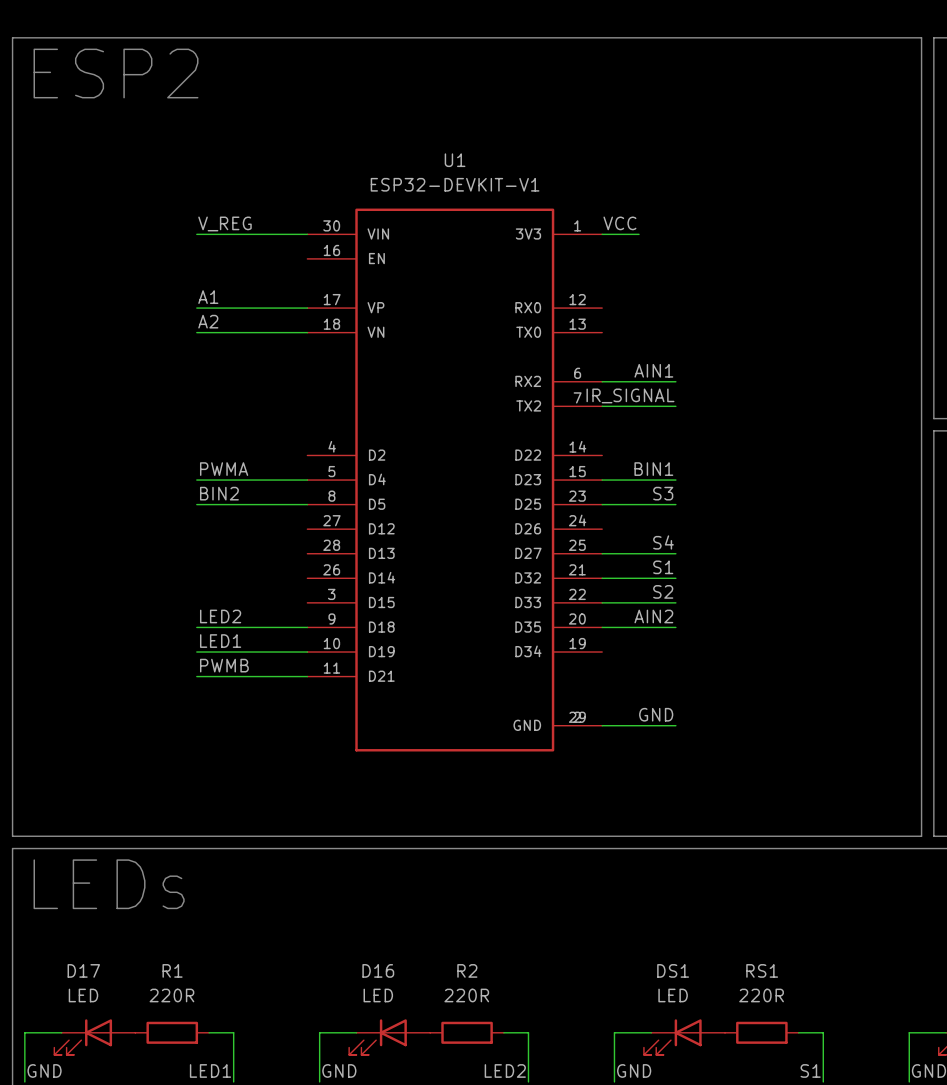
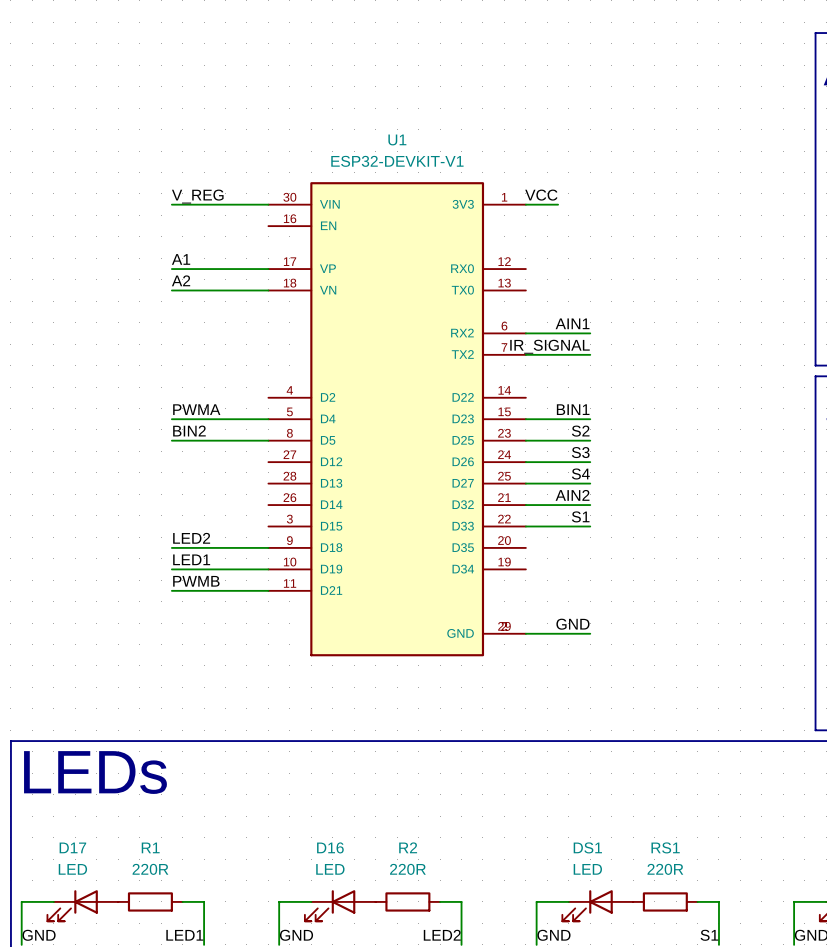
line: (12, 37) (921, 37) (921, 836) (12, 836) (12, 37) -> none
text: ESP2 (116, 73) -> none
label: S3 (663, 493) -> S2 (580, 431)
label: none -> S3 (580, 452)
label: S1 (663, 567) -> AIN2 (572, 495)
label: S2 (663, 591) -> S1 (580, 516)
label: AIN2 (653, 616) -> none
wire: (602, 627) (675, 627) -> (525, 462) (590, 462)

